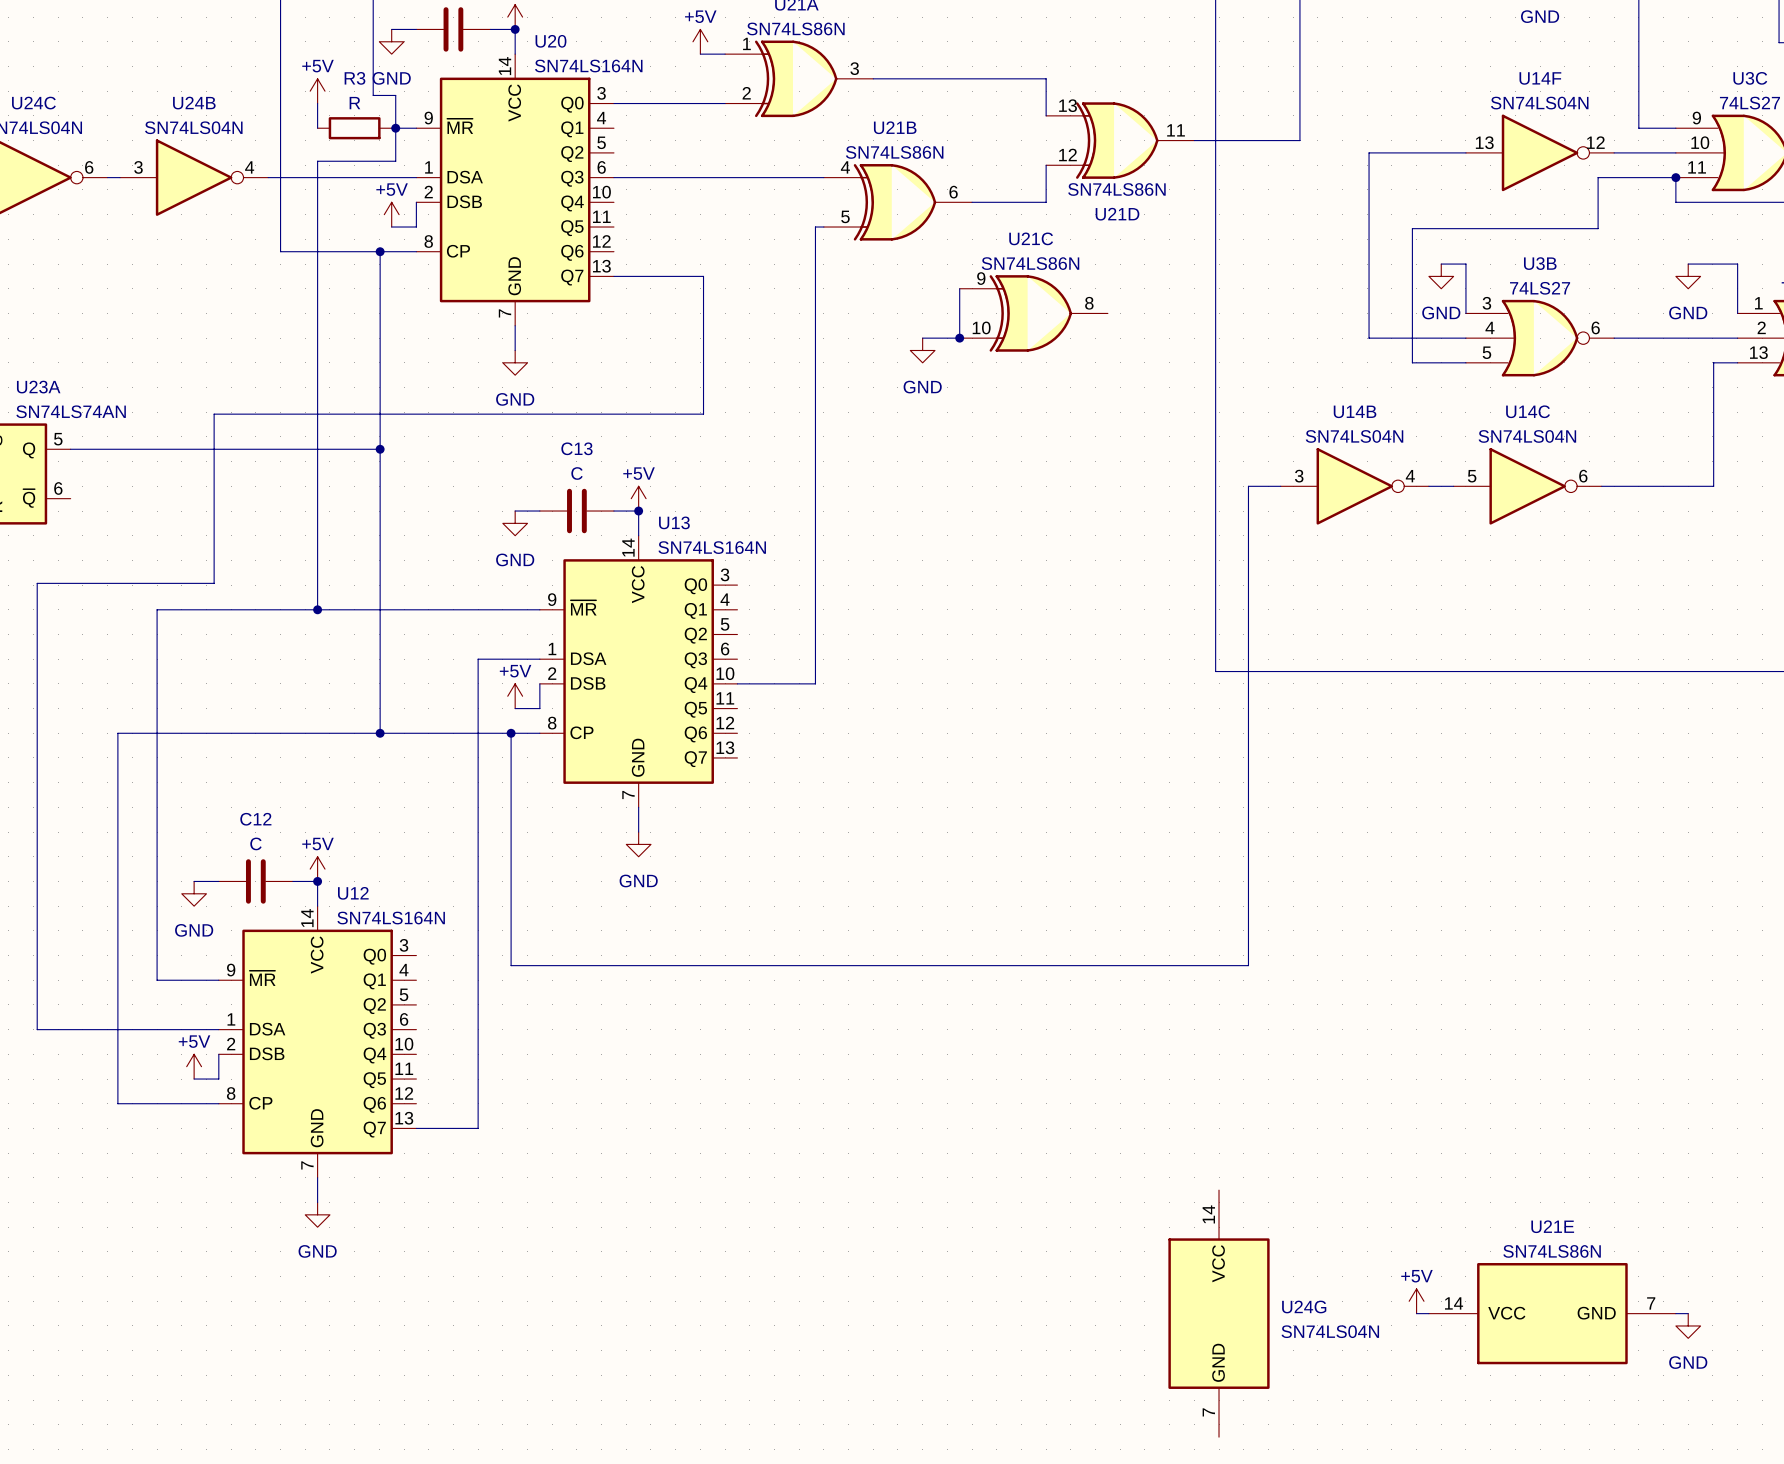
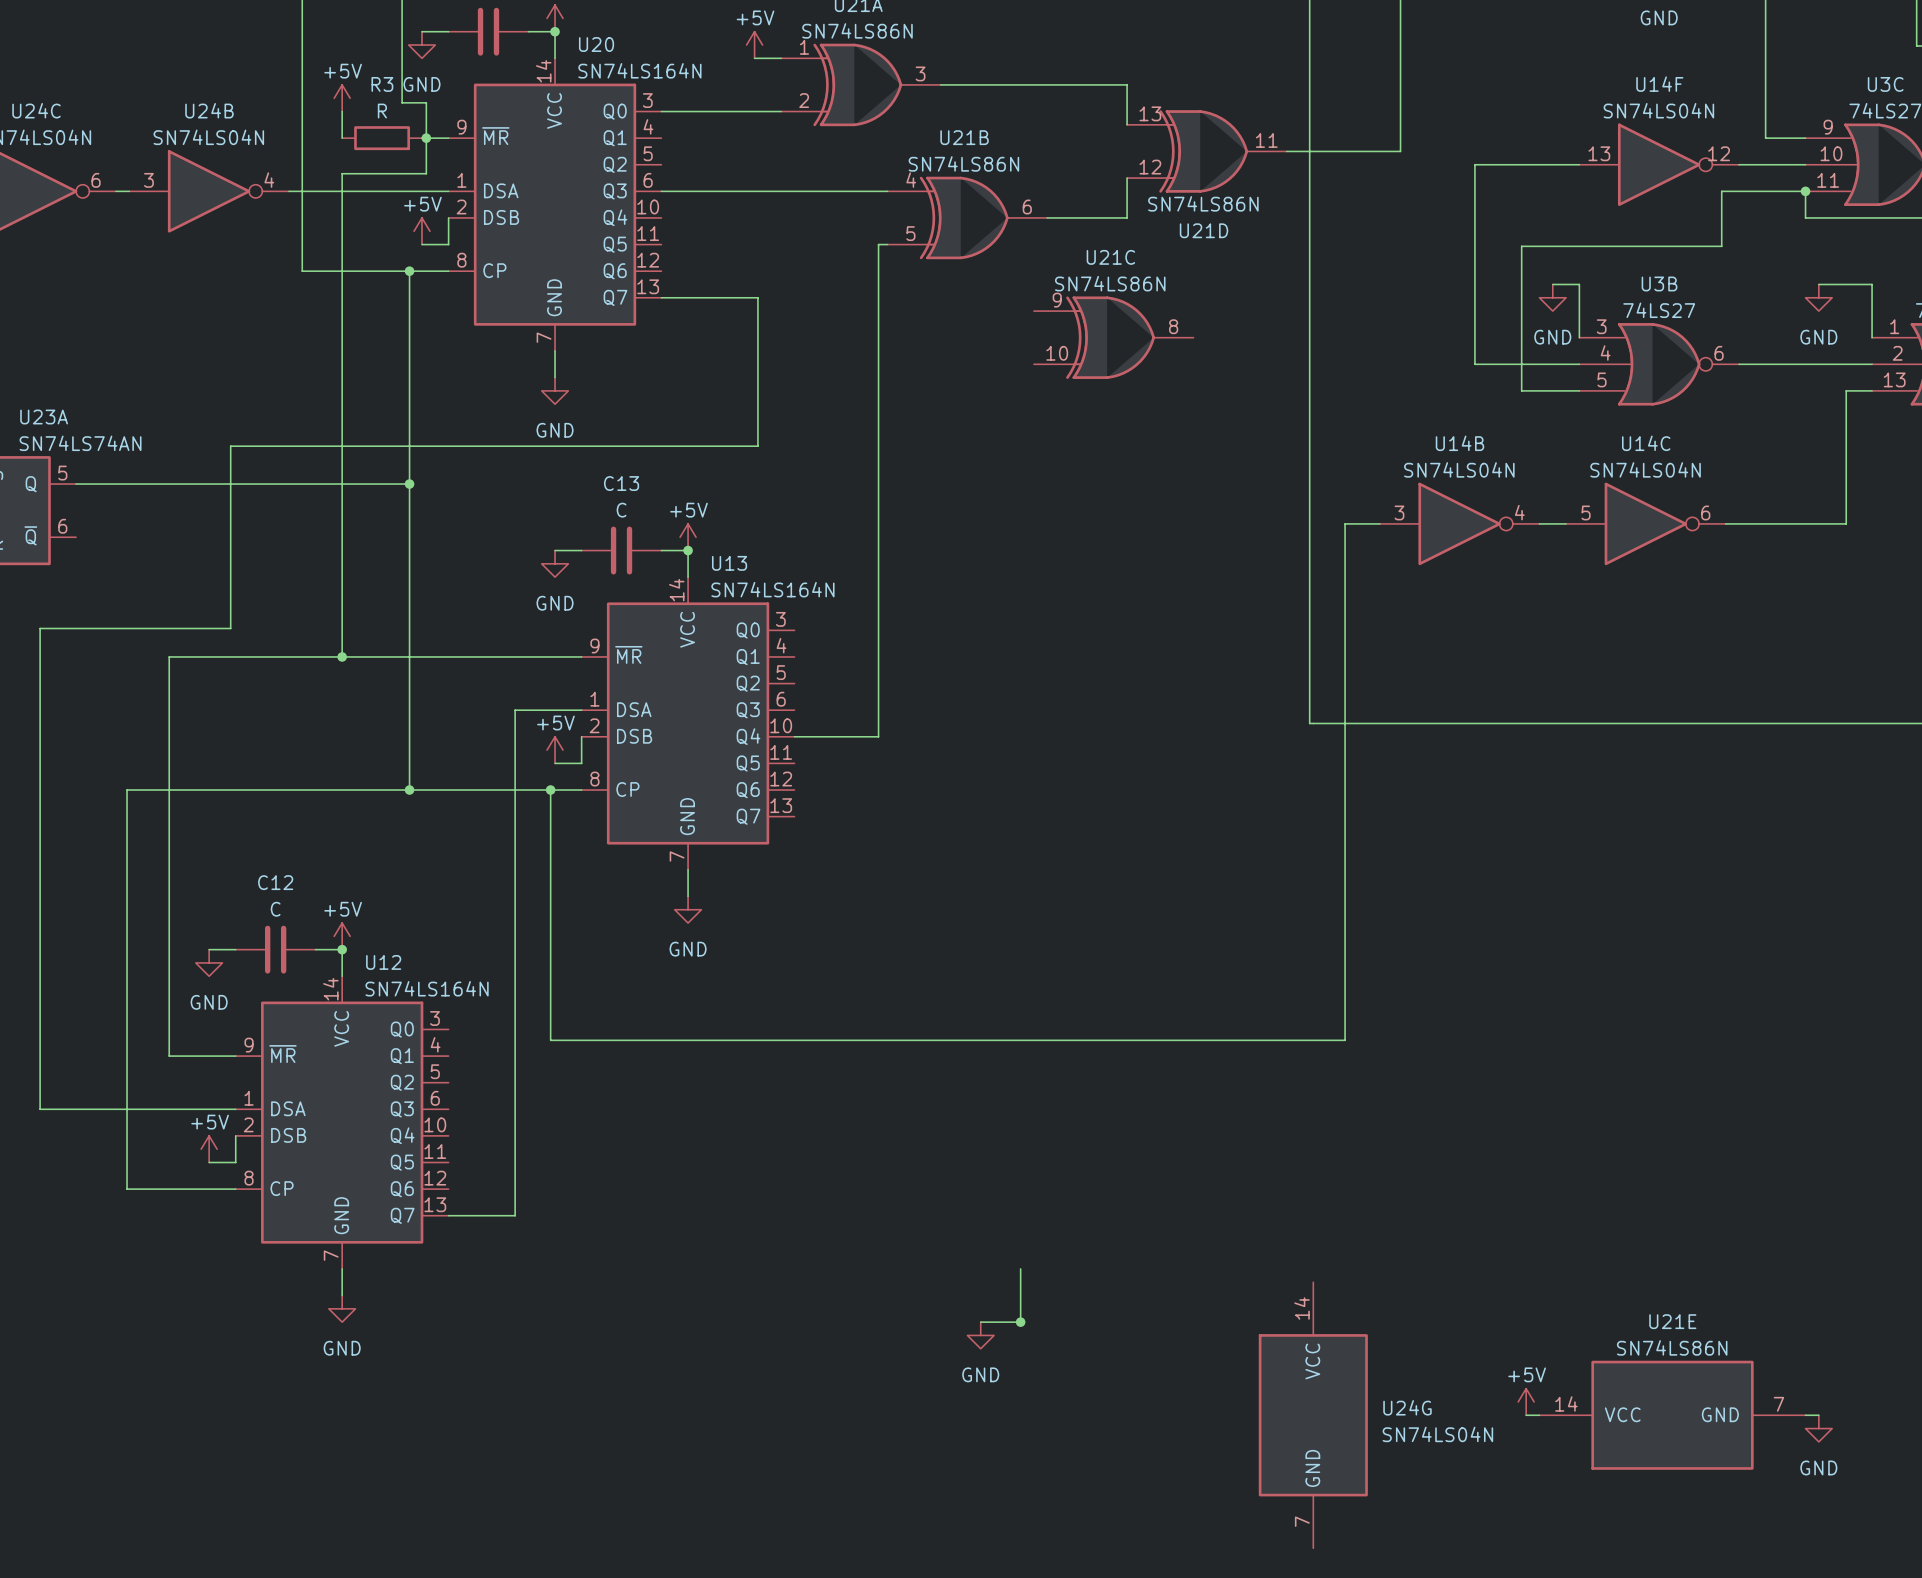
wire: (959, 288) (959, 338) (922, 338) -> none
junction: (959, 338) -> none
power symbol: GND (922, 350) -> none
wire: none -> (1020, 1268) (1020, 1322) (980, 1322)
junction: none -> (1020, 1322)
power symbol: none -> GND (980, 1335)

